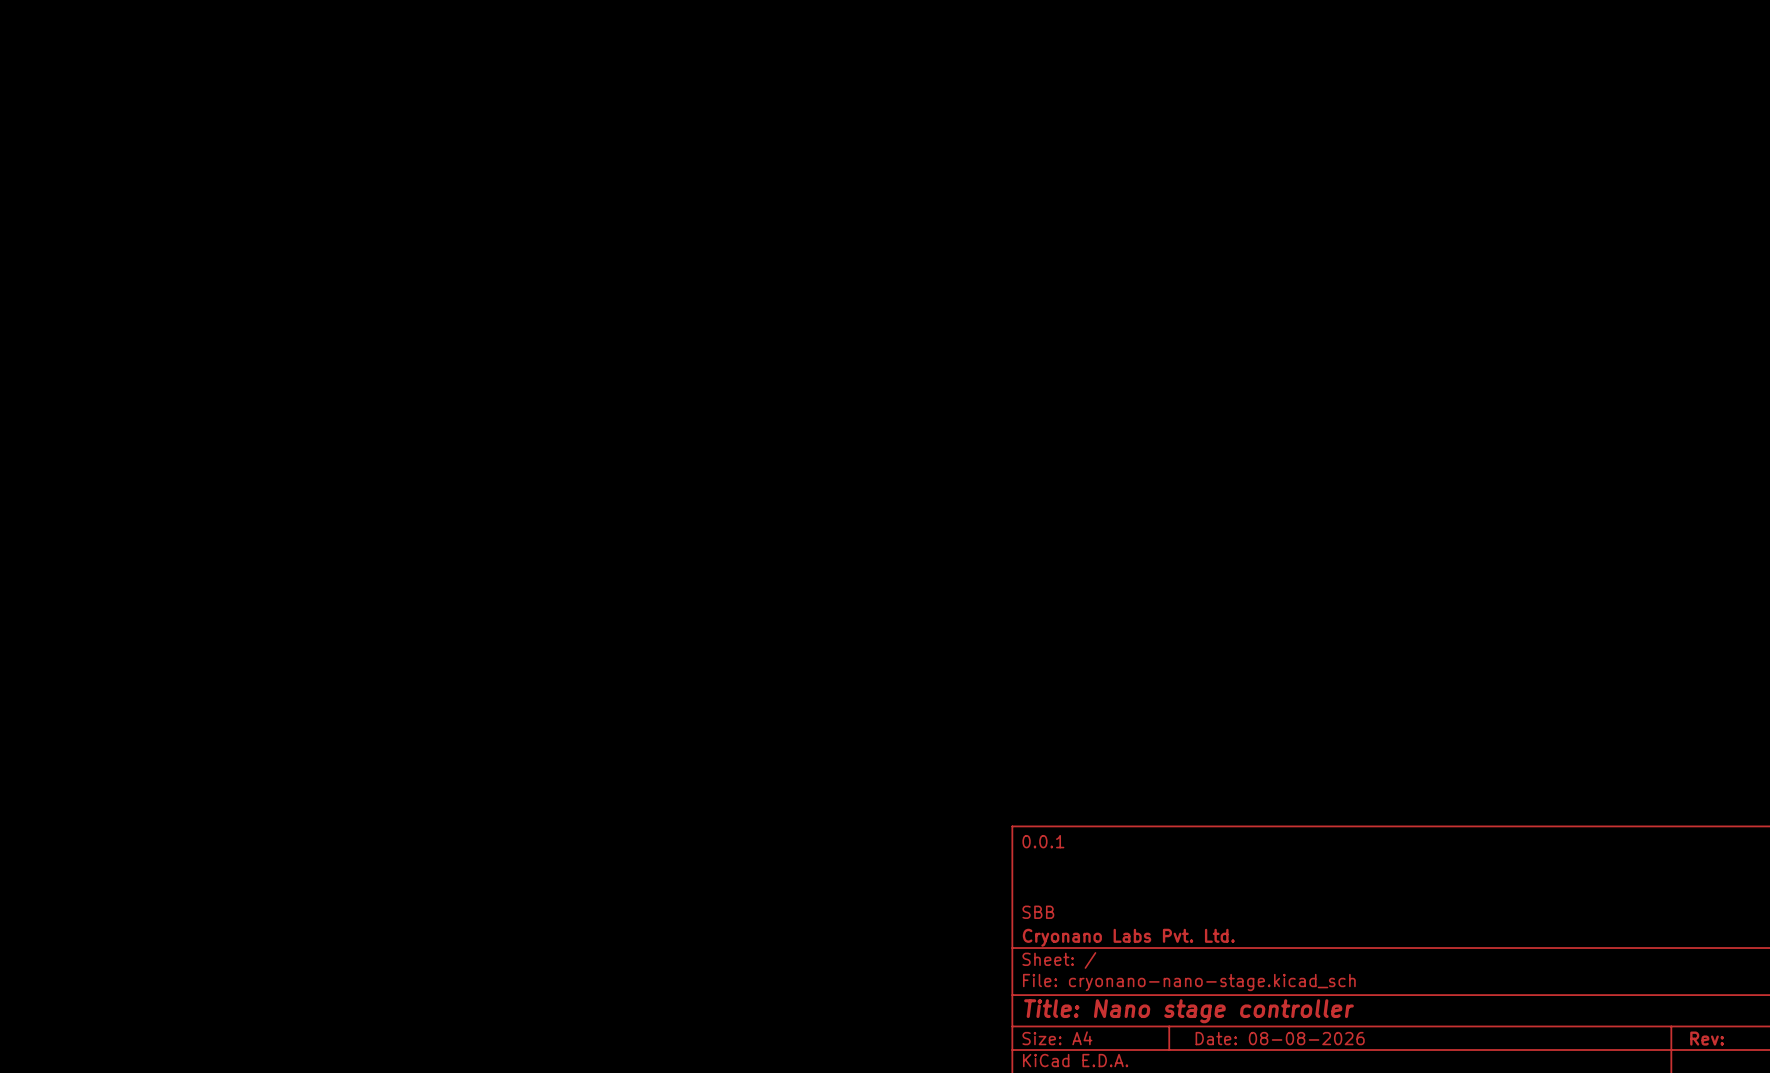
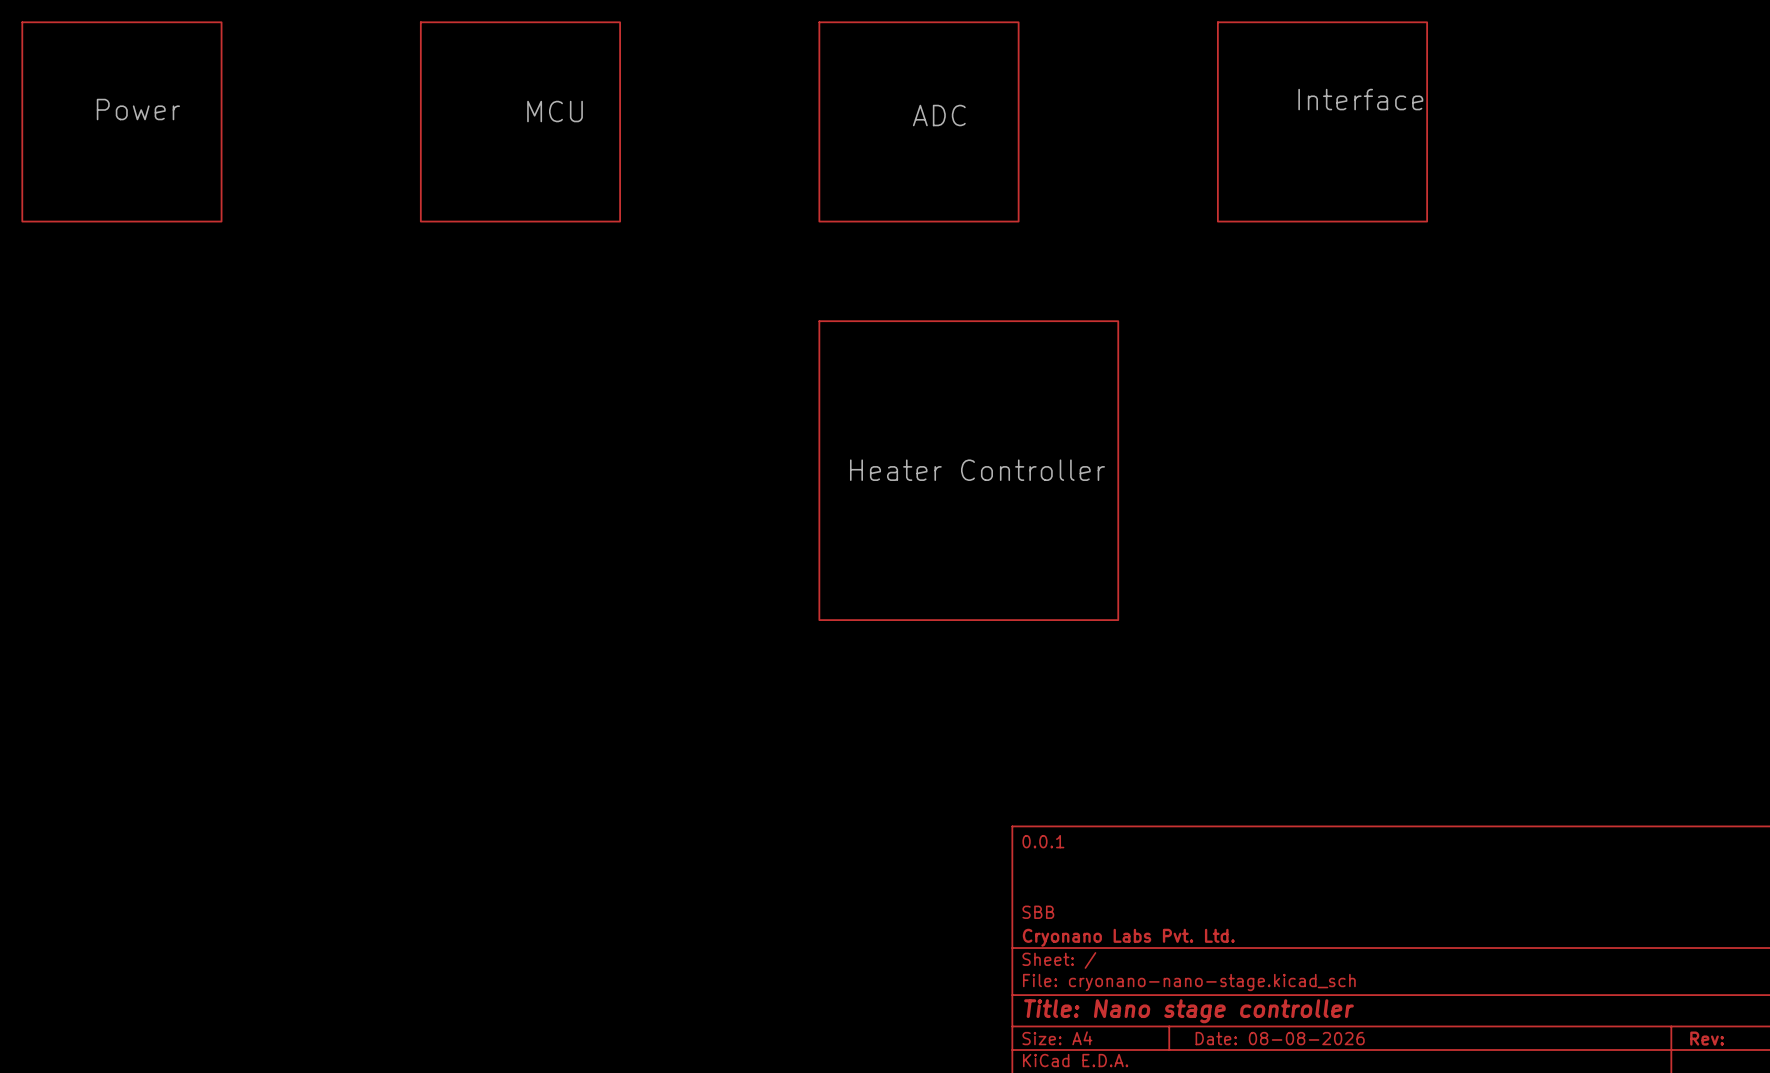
sheet Power: none -> (121, 121)
sheet MCU: none -> (520, 121)
sheet ADC: none -> (918, 121)
sheet Interface: none -> (1322, 121)
sheet Heater Controller: none -> (968, 470)

